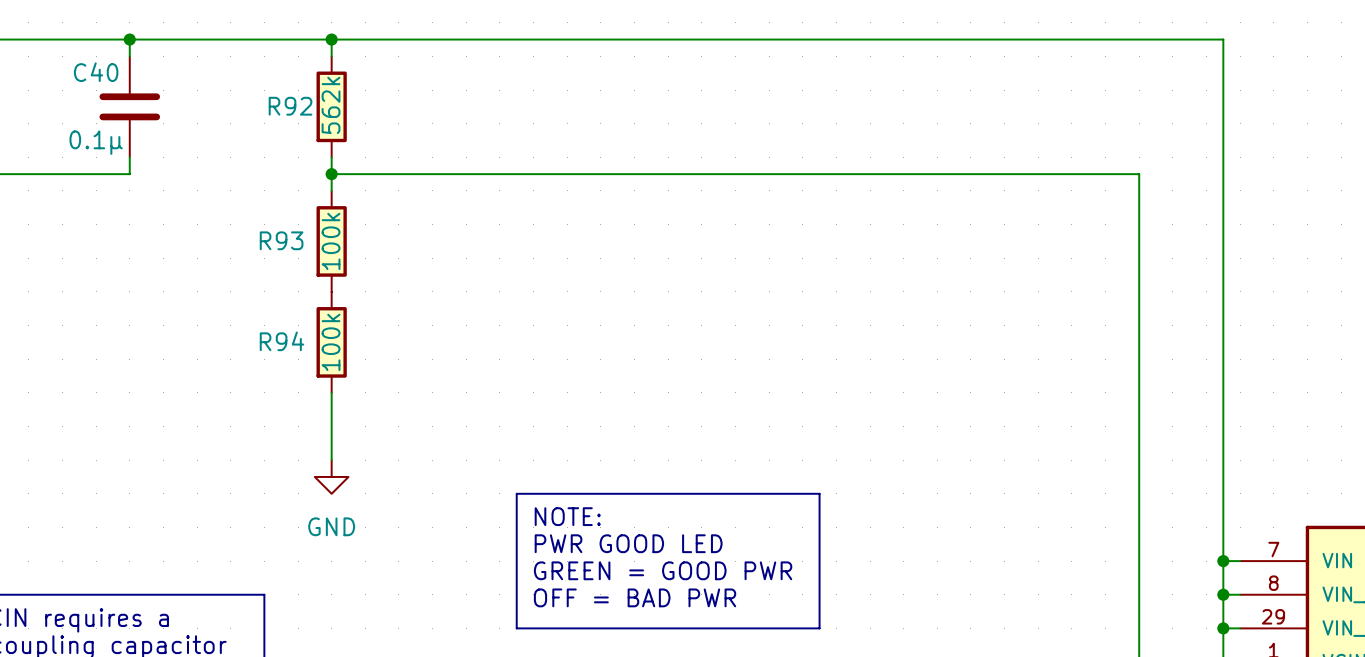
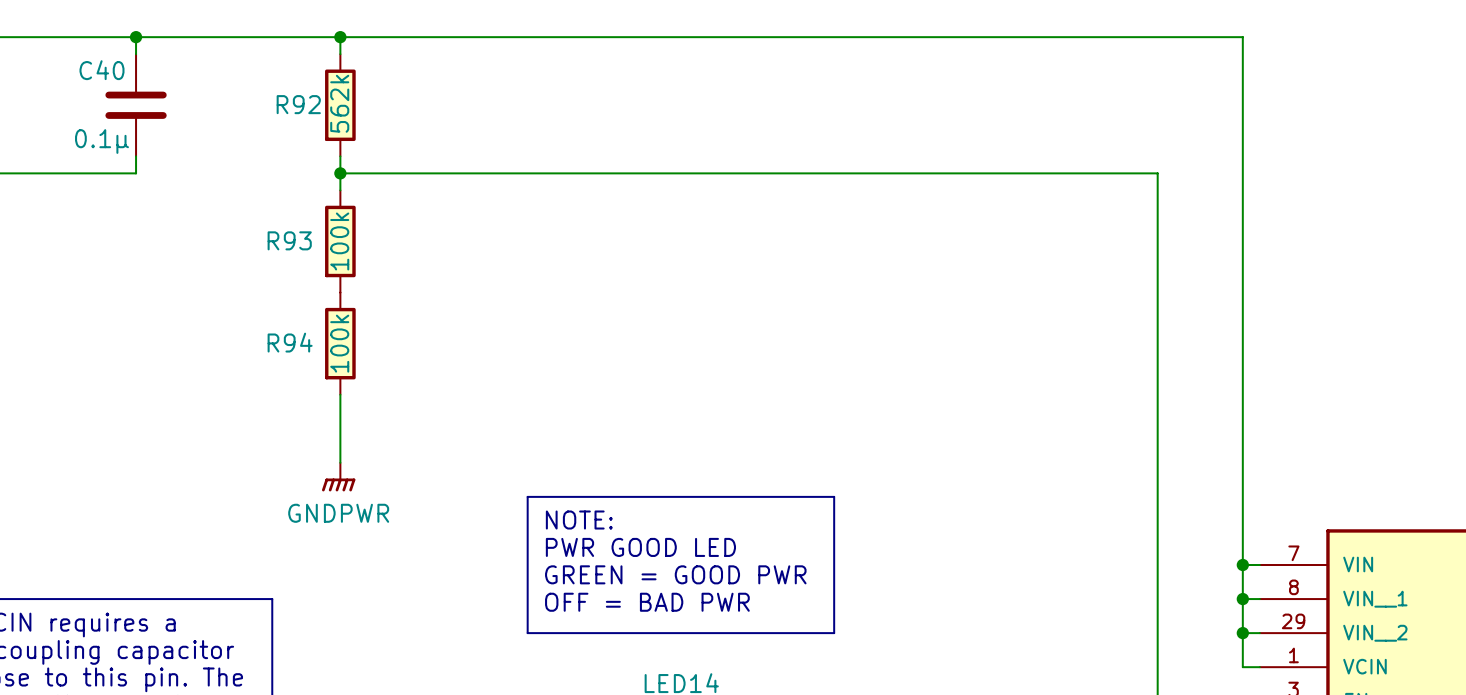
power symbol: GND (331, 476) -> GNDPWR (338, 477)

